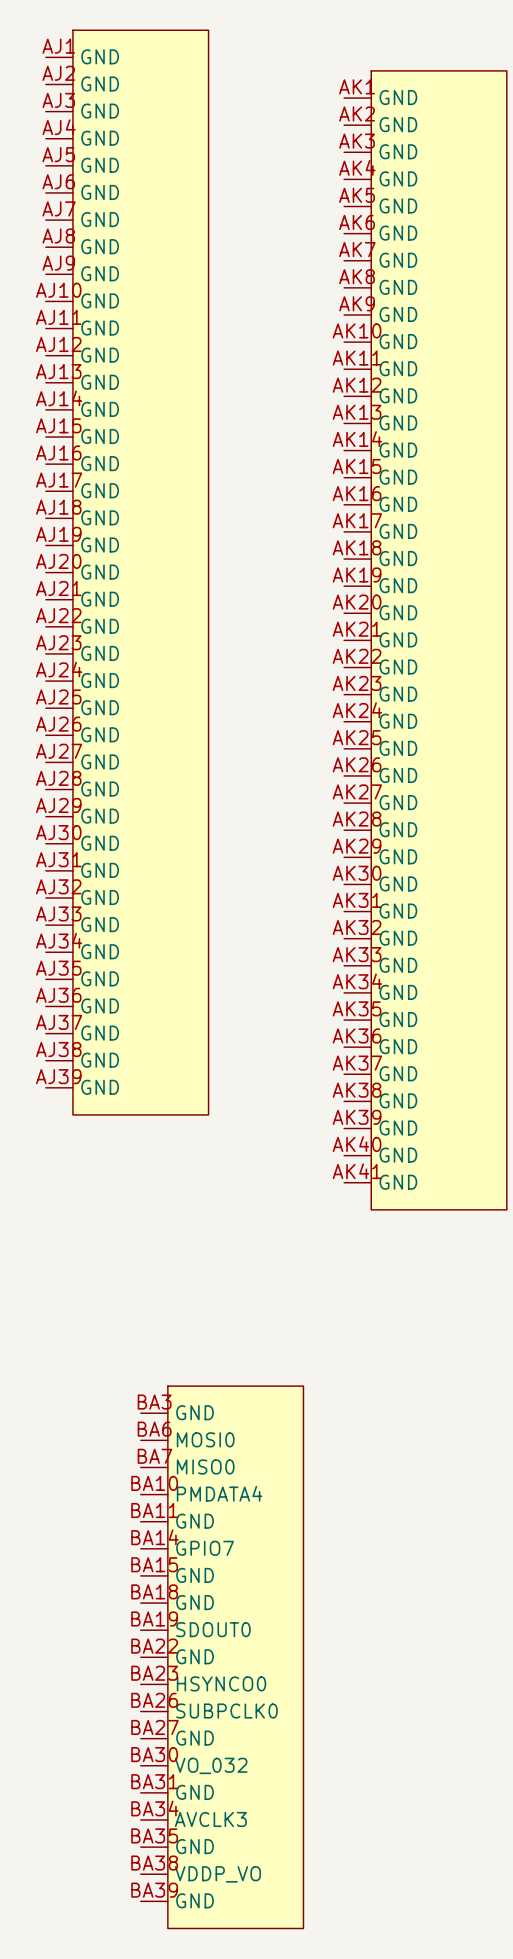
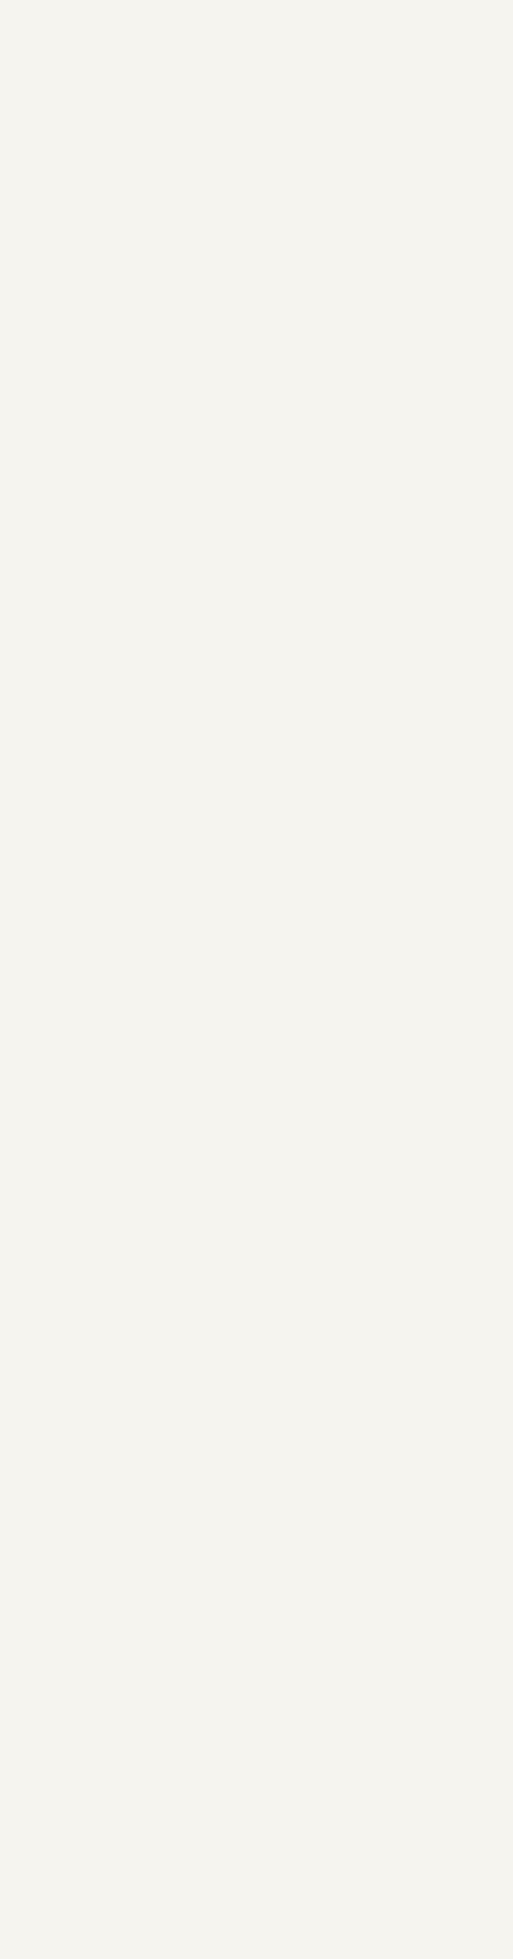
part: (127, 572) -> none
part: (425, 640) -> none
part: (222, 1657) -> none

